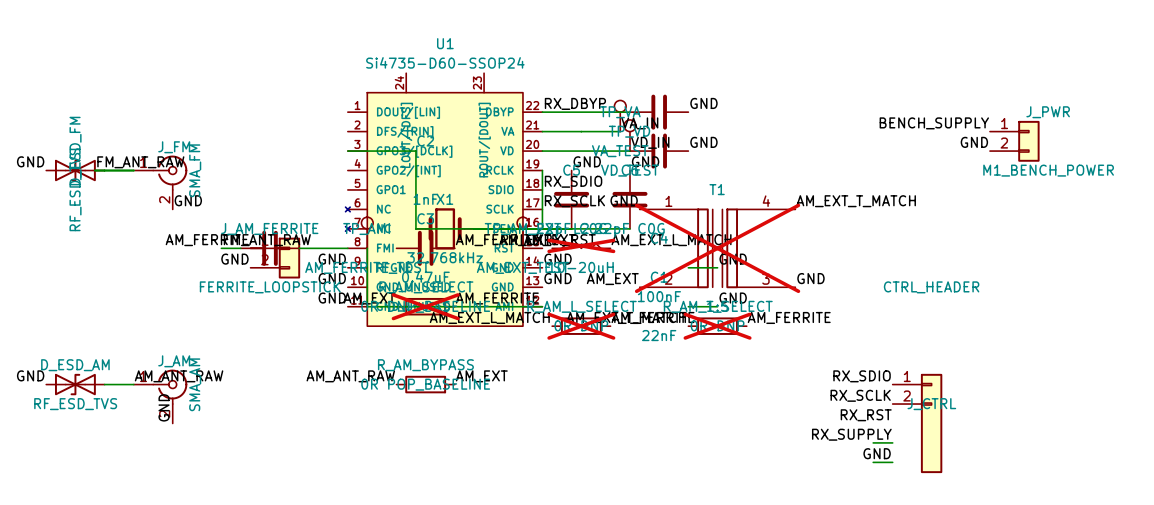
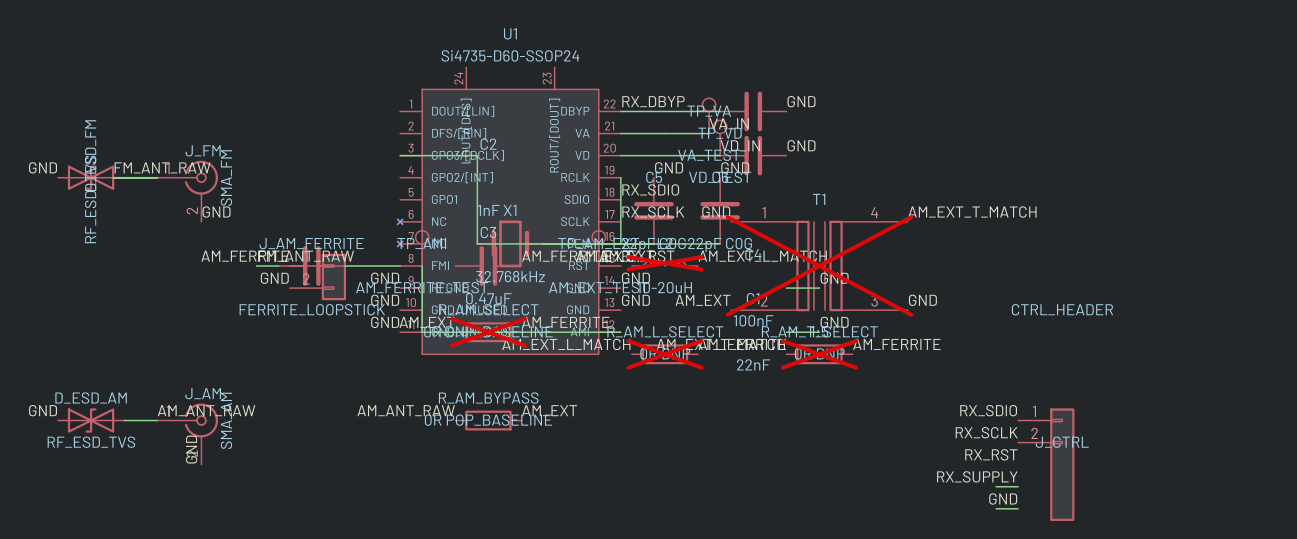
label: BENCH_SUPPLY (934, 123) -> none
J_PWR: M1_BENCH_POWER (1014, 141) -> none
label: GND (974, 142) -> none

